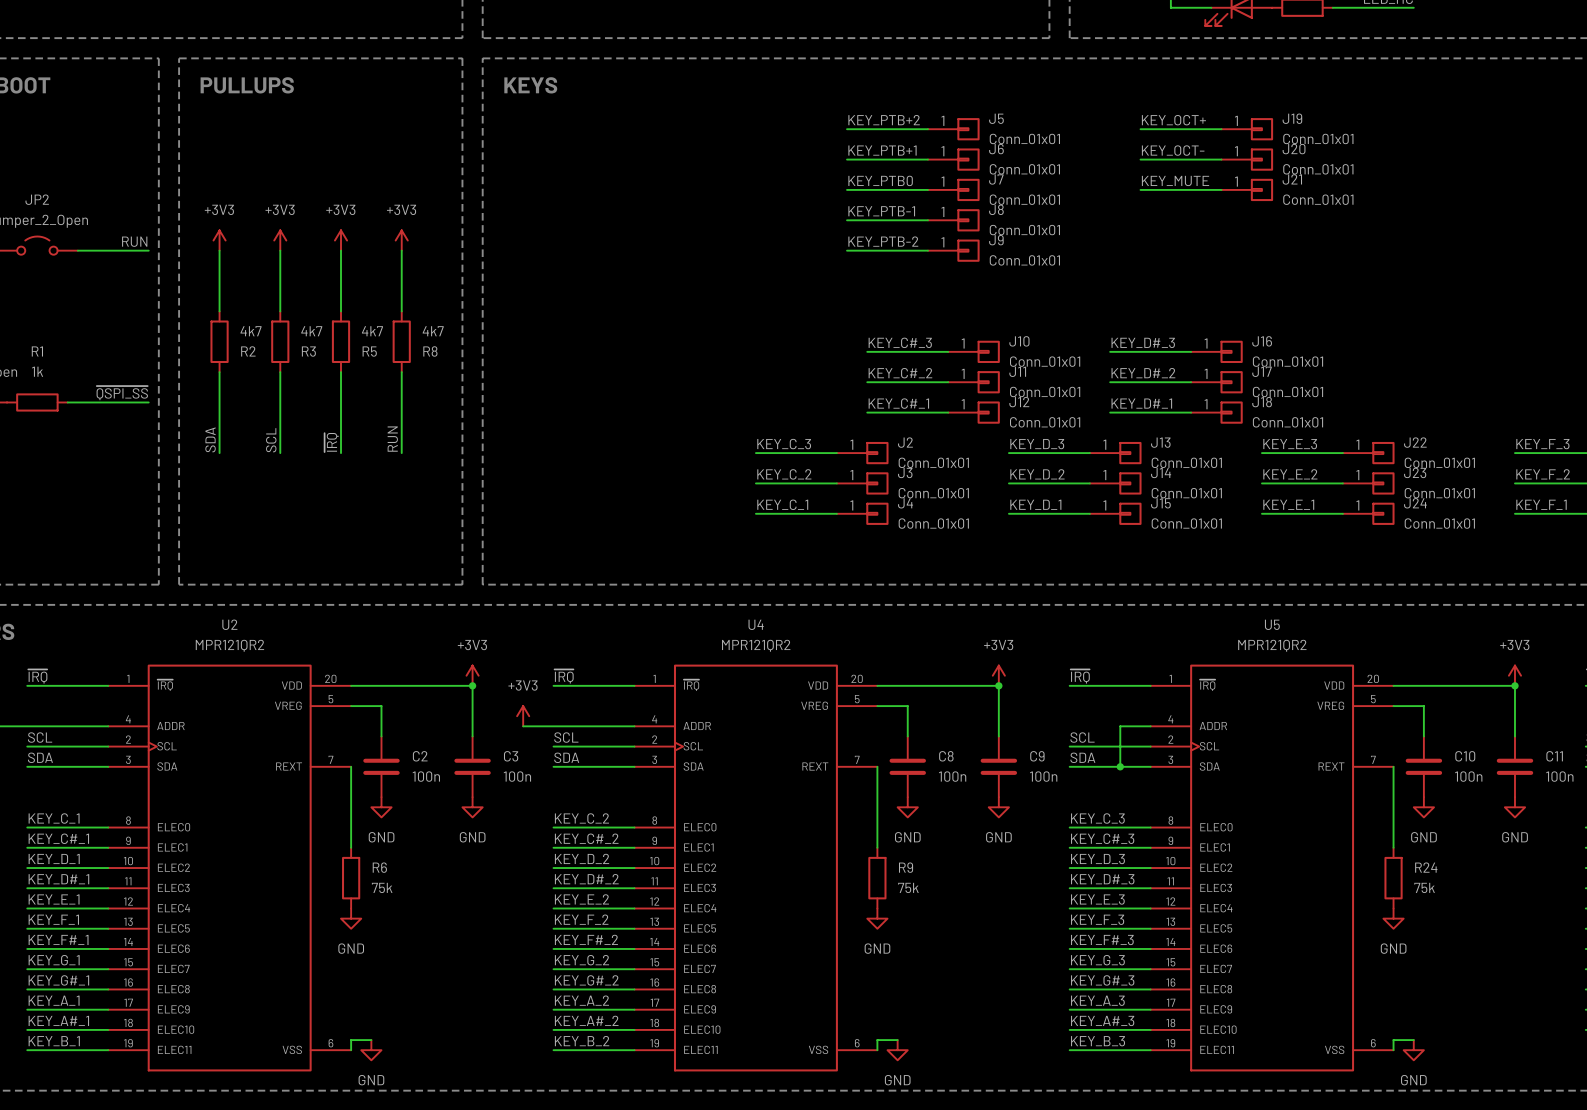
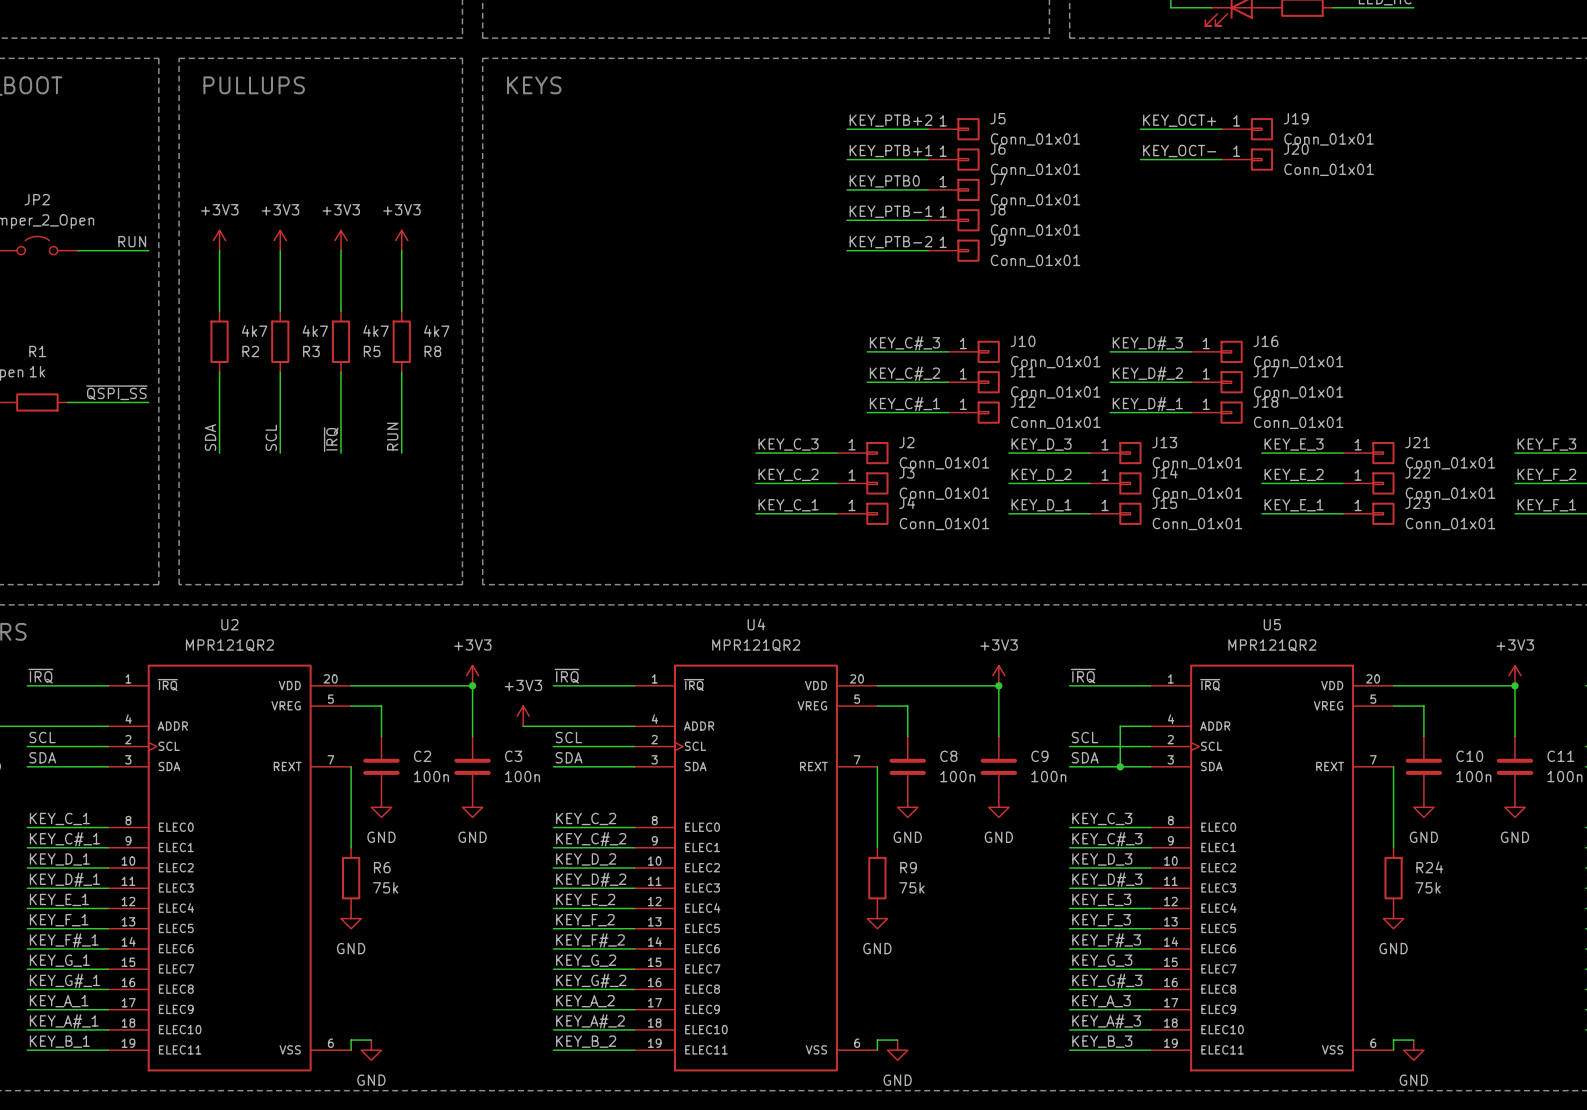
label: KEY_MUTE (1175, 180) -> none
wire: (1140, 189) (1221, 189) -> none
J21: Conn_01x01 (1247, 189) -> none
J22 name: J22 (1415, 442) -> J21 (1417, 442)
J23 name: J23 (1415, 472) -> J22 (1417, 472)
J24 name: J24 (1415, 503) -> J23 (1417, 503)

